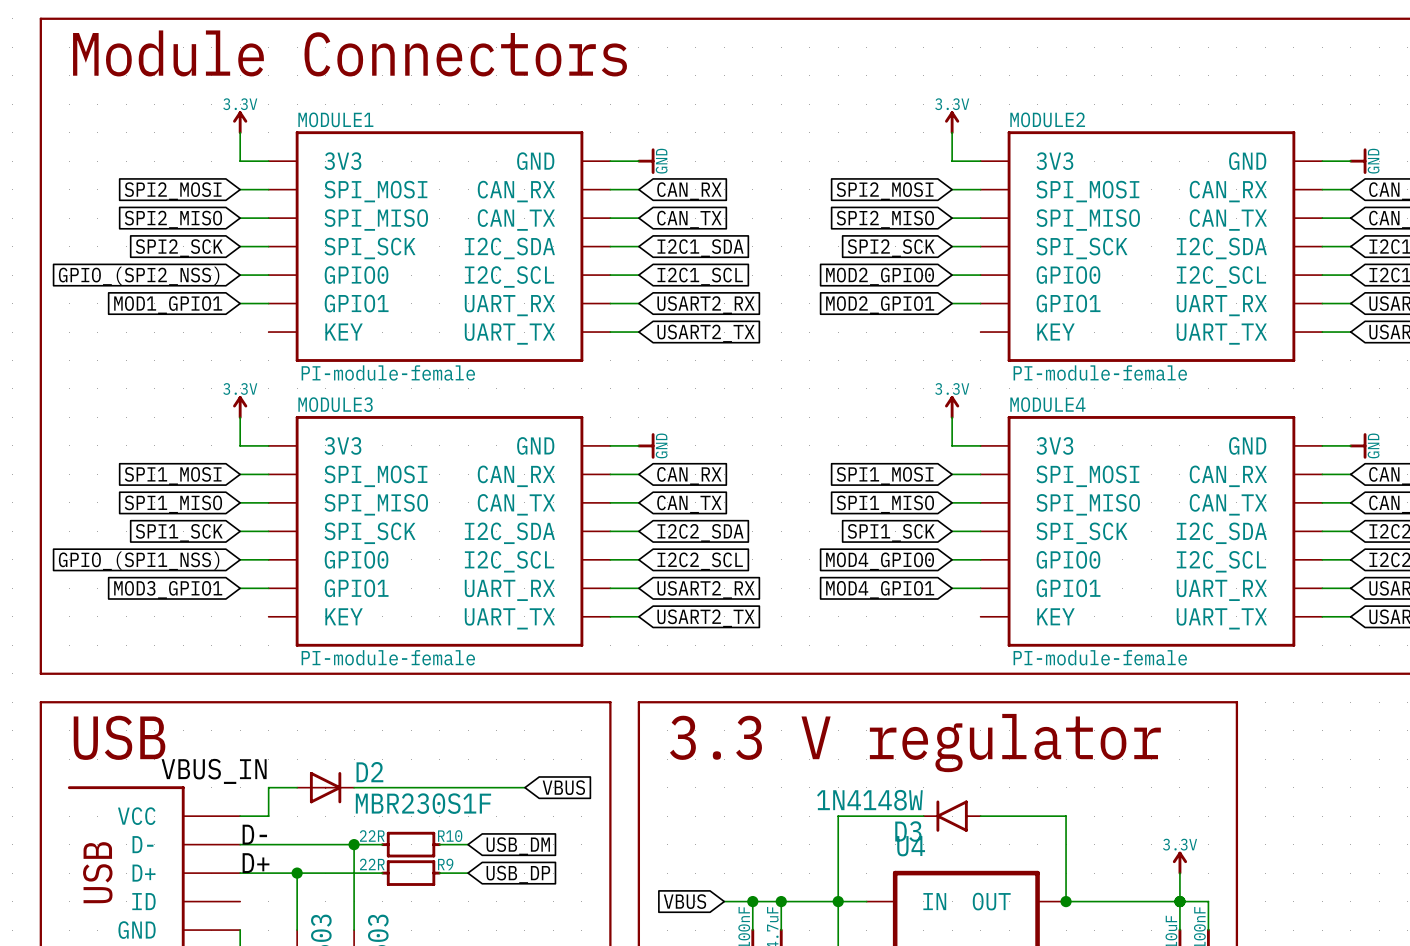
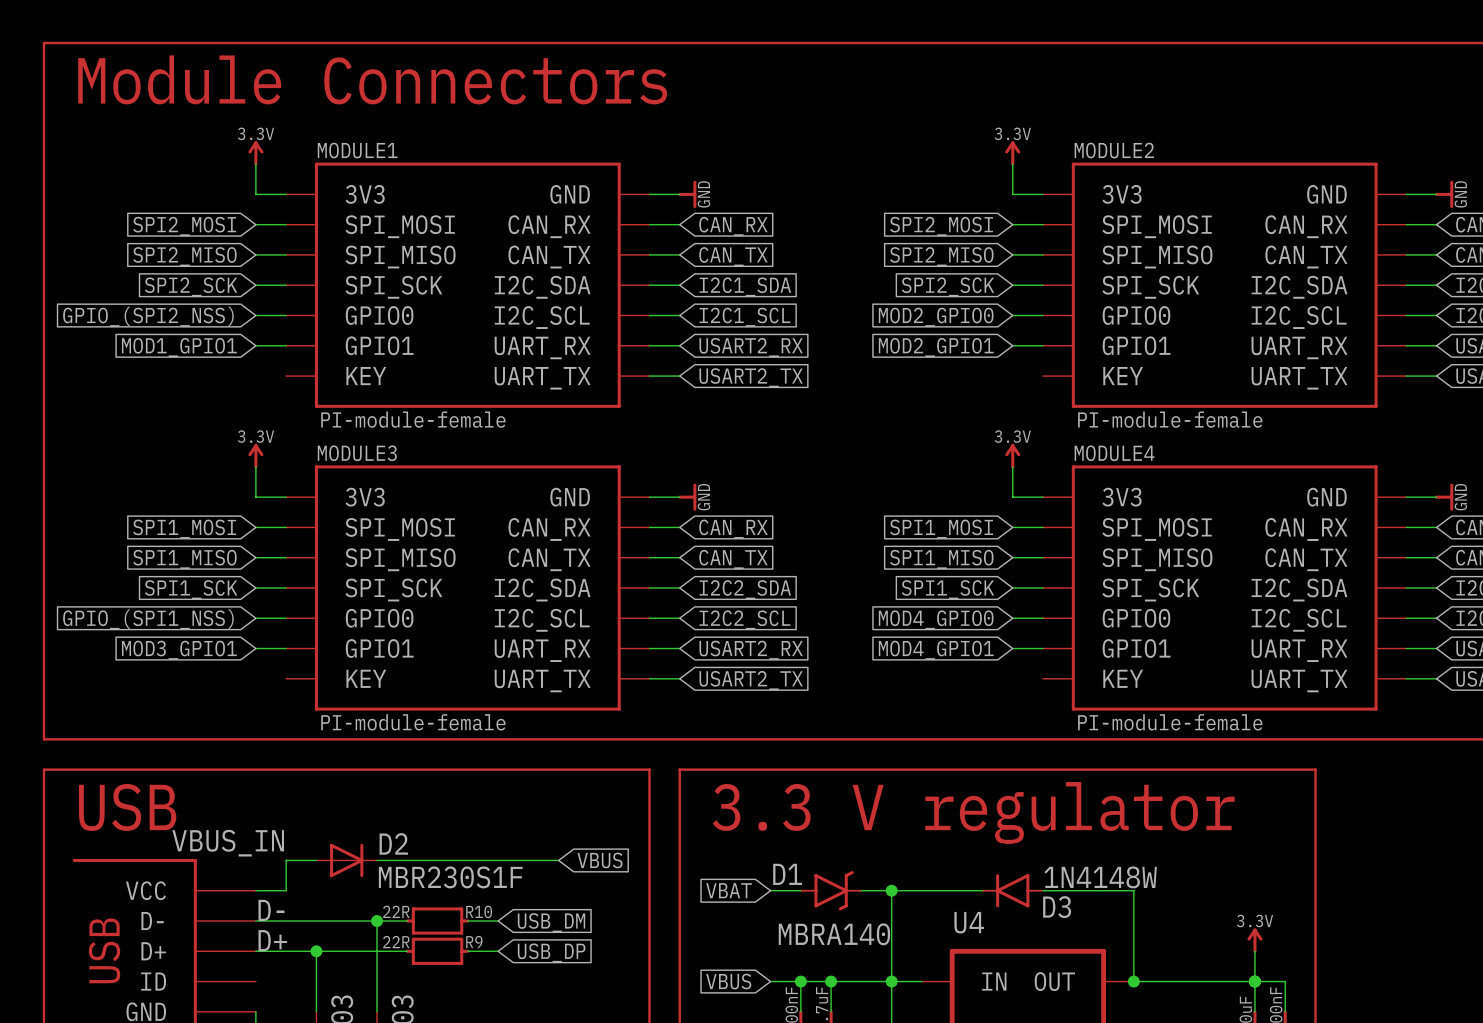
D3 value position: 1N4148W (869, 800) -> 1N4148W (1100, 877)
global label: none -> VBAT (729, 890)
wire: none -> (770, 890) (800, 890)
D1: none -> MBRA140 (831, 890)
wire: none -> (861, 890) (891, 890)
junction: none -> (891, 890)
D3 name position: D3 (908, 831) -> D3 (1057, 907)

